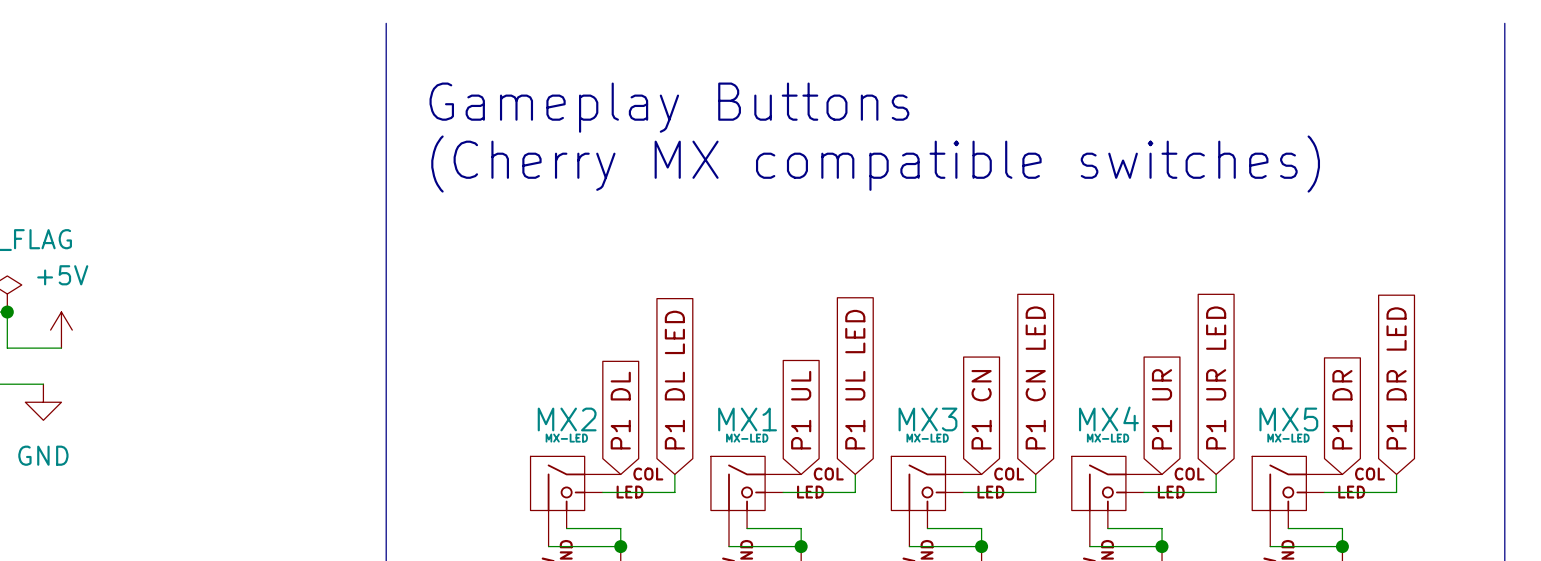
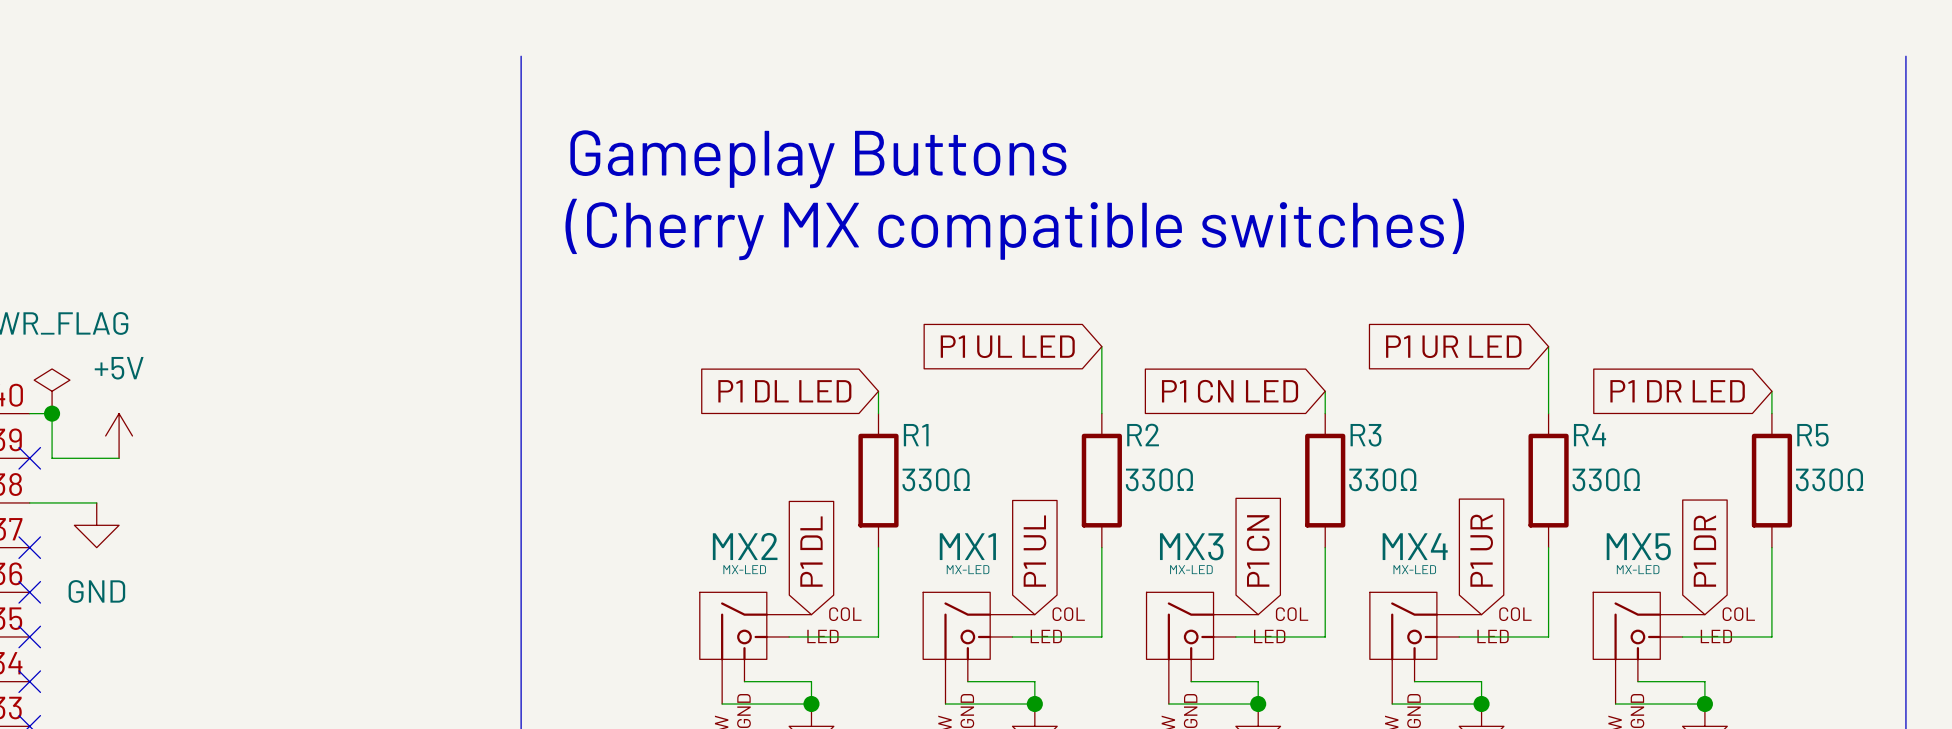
wire: none -> (1101, 346) (1101, 413)
wire: none -> (1548, 346) (1548, 413)
wire: none -> (878, 391) (878, 413)
wire: none -> (1325, 391) (1325, 413)
wire: none -> (1771, 391) (1771, 413)
R1: none -> 330Ω (878, 480)
R2: none -> 330Ω (1101, 480)
R3: none -> 330Ω (1325, 480)
R4: none -> 330Ω (1548, 480)
R5: none -> 330Ω (1771, 480)
global label rotation: 0° (1035, 377) -> 90° counterclockwise (1230, 391)
global label rotation: 0° (1216, 377) -> 90° counterclockwise (1453, 346)
global label rotation: 0° (1396, 378) -> 90° counterclockwise (1677, 391)
global label rotation: 0° (855, 379) -> 90° counterclockwise (1007, 346)
global label rotation: 0° (674, 380) -> 90° counterclockwise (784, 391)
wire: none -> (878, 547) (878, 614)
wire: none -> (1101, 547) (1101, 614)
wire: none -> (1325, 547) (1325, 614)
wire: none -> (1548, 547) (1548, 614)
wire: none -> (1771, 547) (1771, 614)

